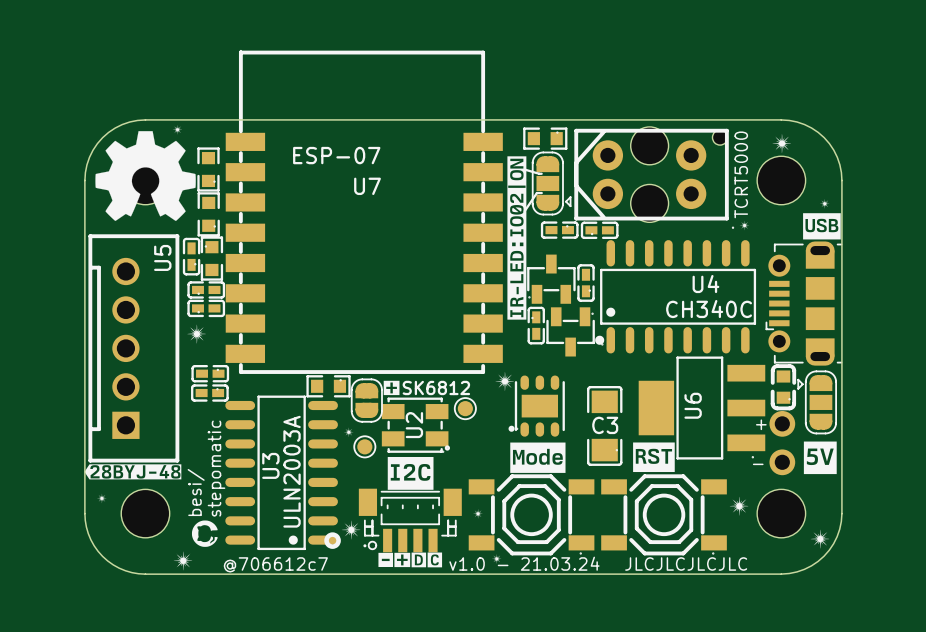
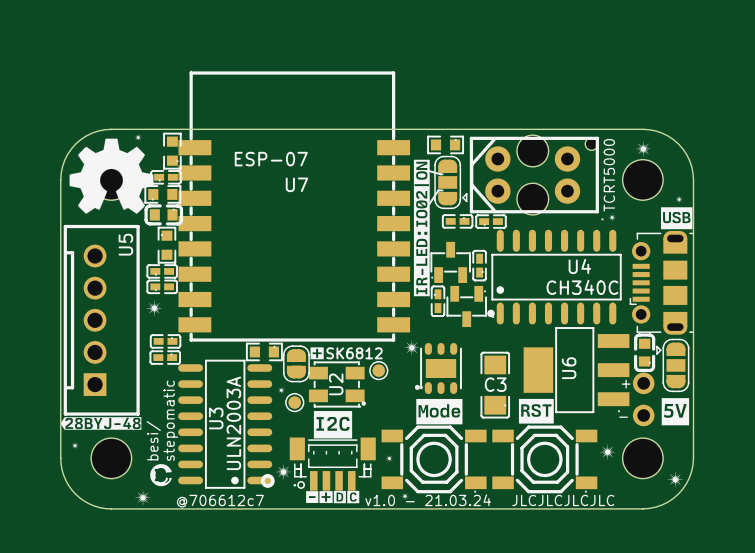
part: none -> (172, 151)
part footprint: [197, 147, 220, 192] -> [150, 170, 182, 185]
part footprint: [197, 192, 220, 237] -> [144, 204, 184, 226]
part: none -> (162, 194)
part: (191, 256) -> none

